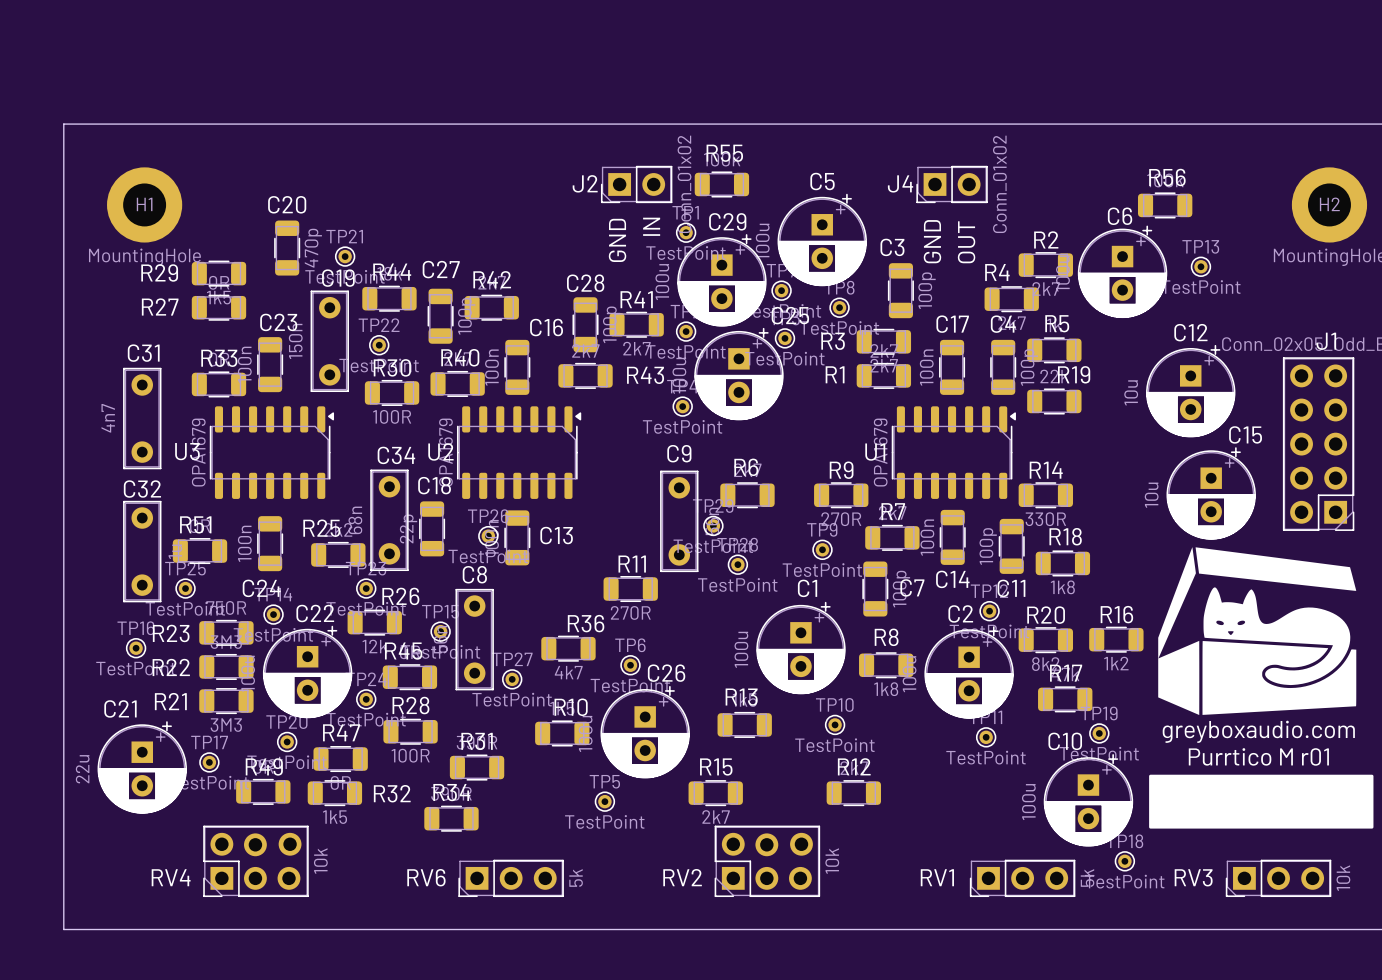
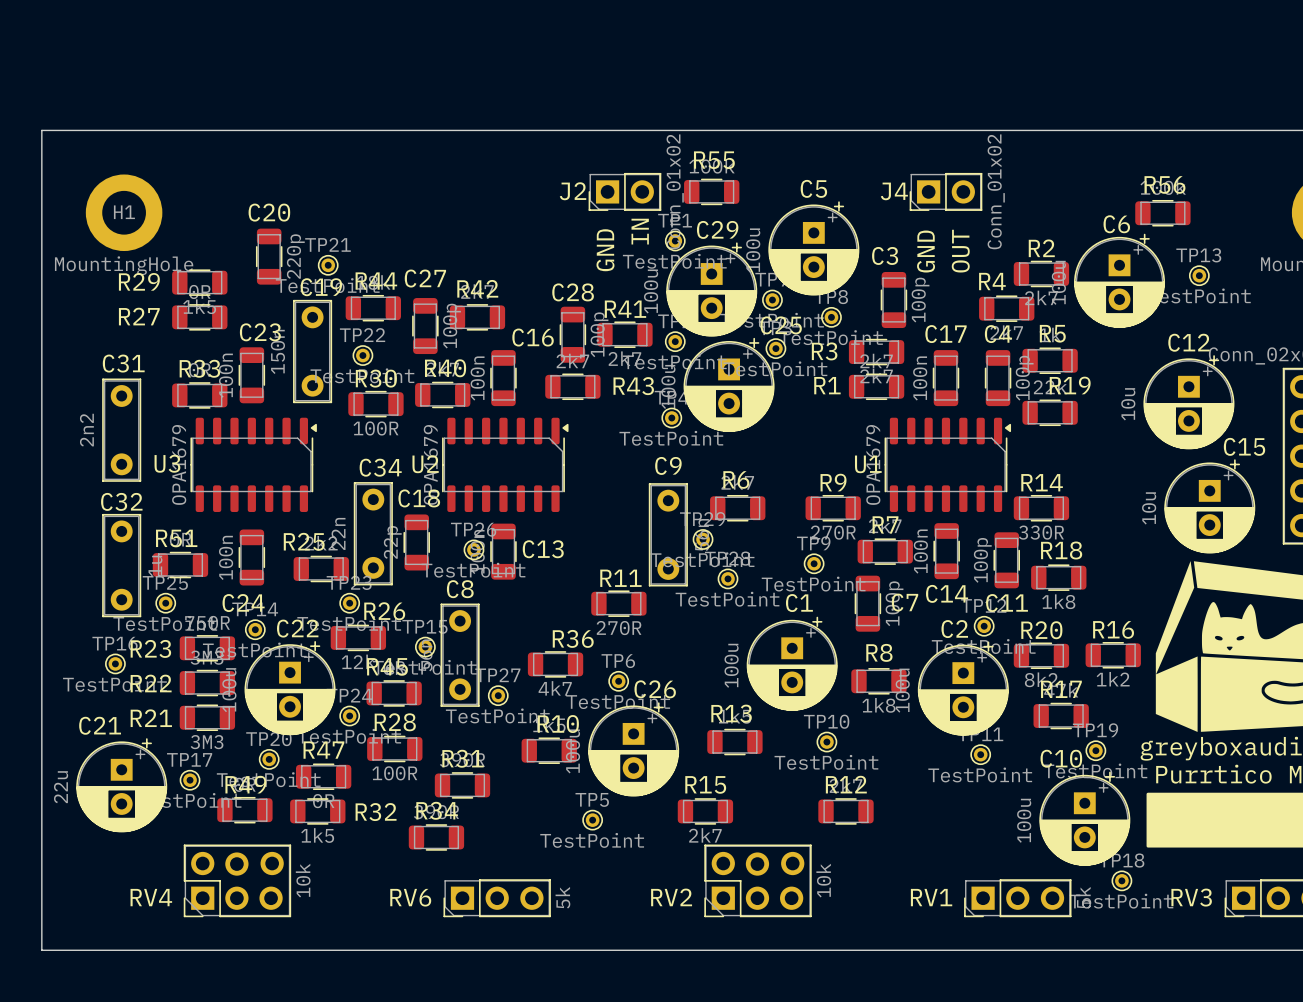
C20 value: 470p (313, 248) -> 220p (295, 256)
C31 value: 4n7 (108, 418) -> 2n2 (86, 430)
C34 value: 68n (355, 520) -> 22n (338, 533)

